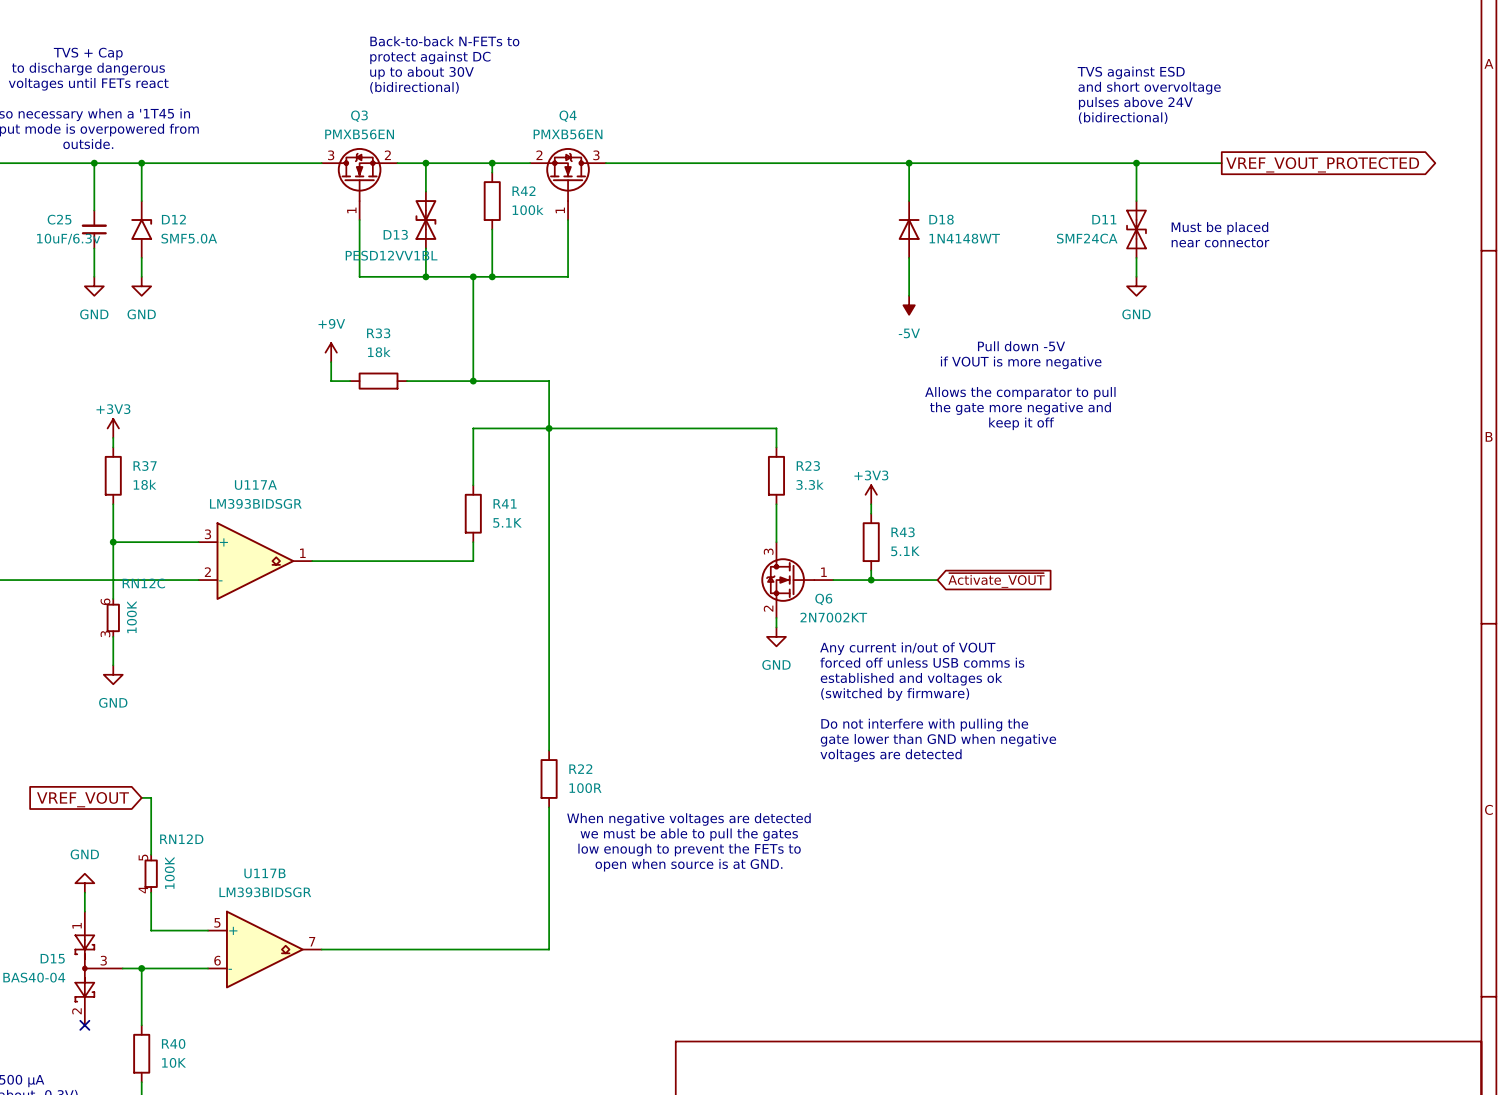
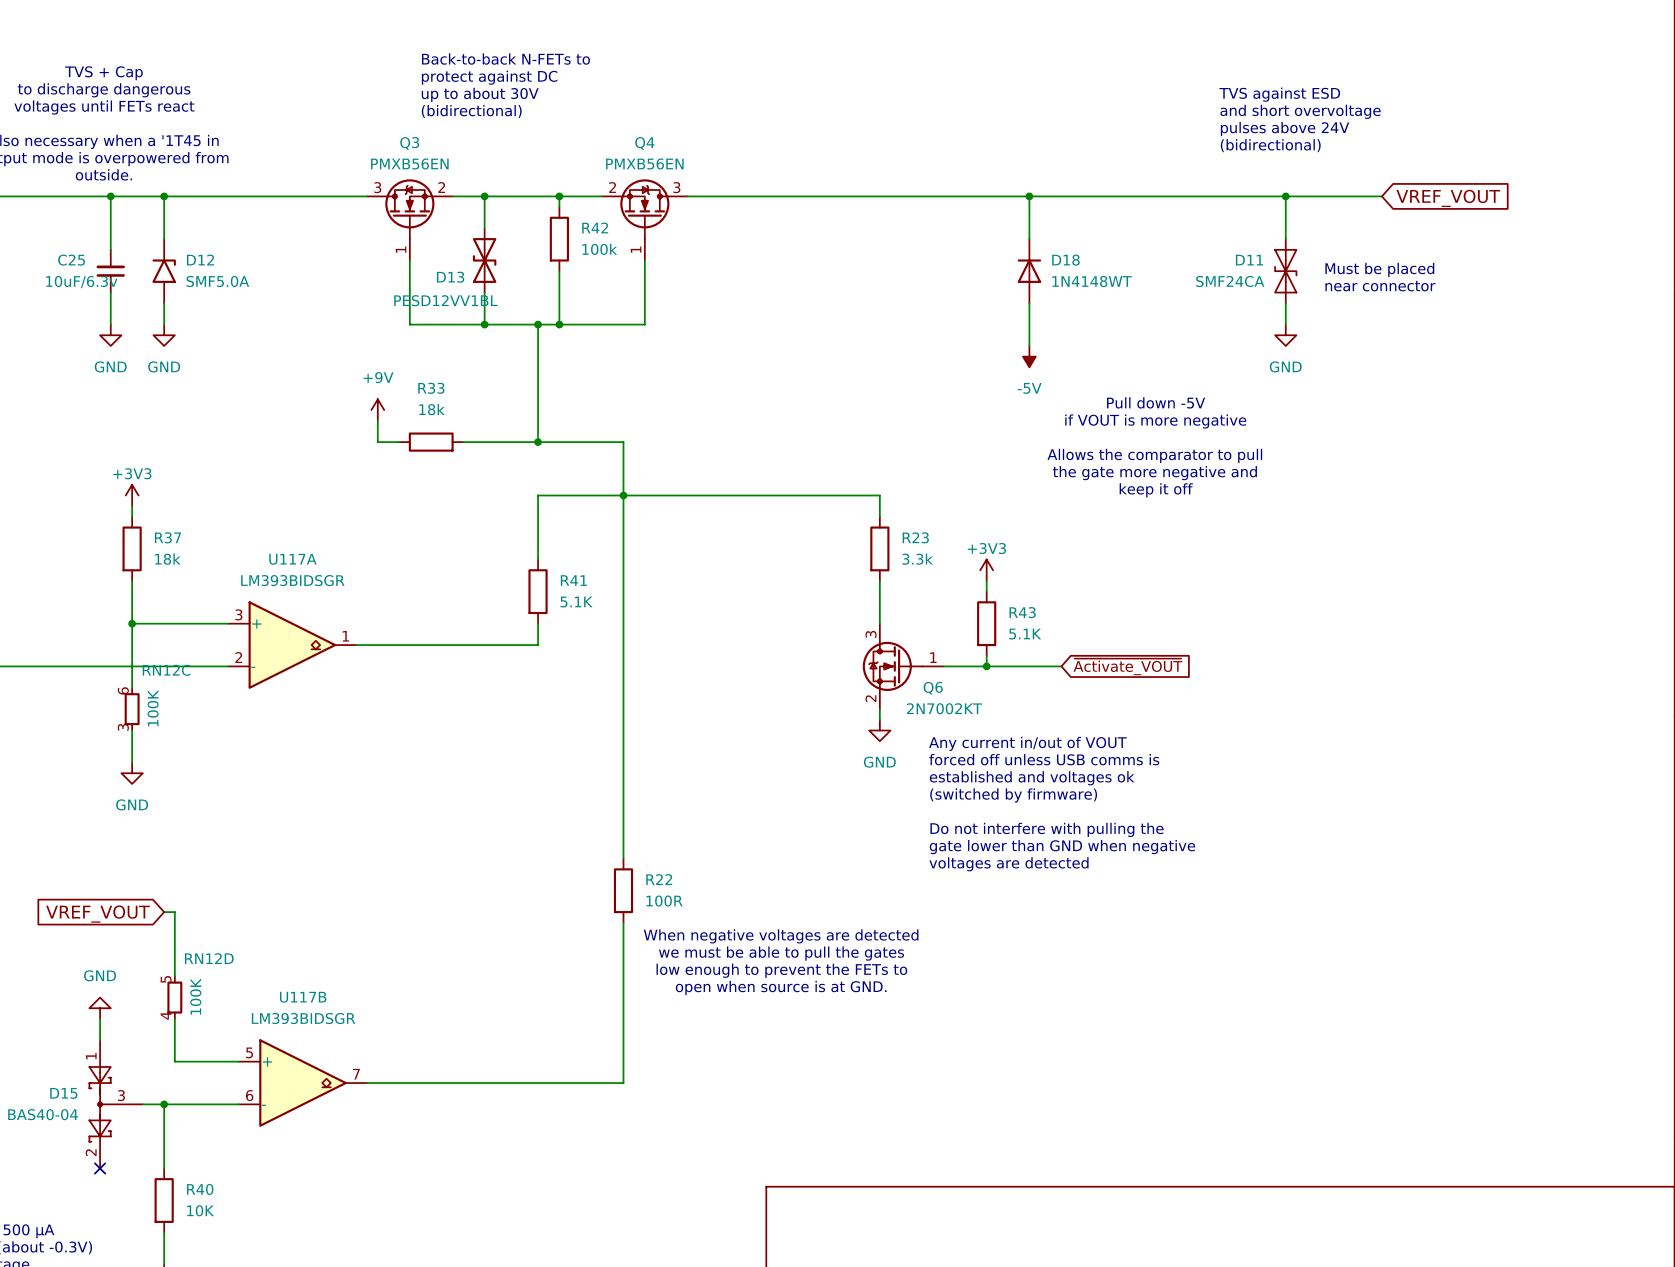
global label shape: output (1322, 164) -> input (1448, 198)
global label: VREF_VOUT_PROTECTED (1322, 164) -> VREF_VOUT (1448, 198)

